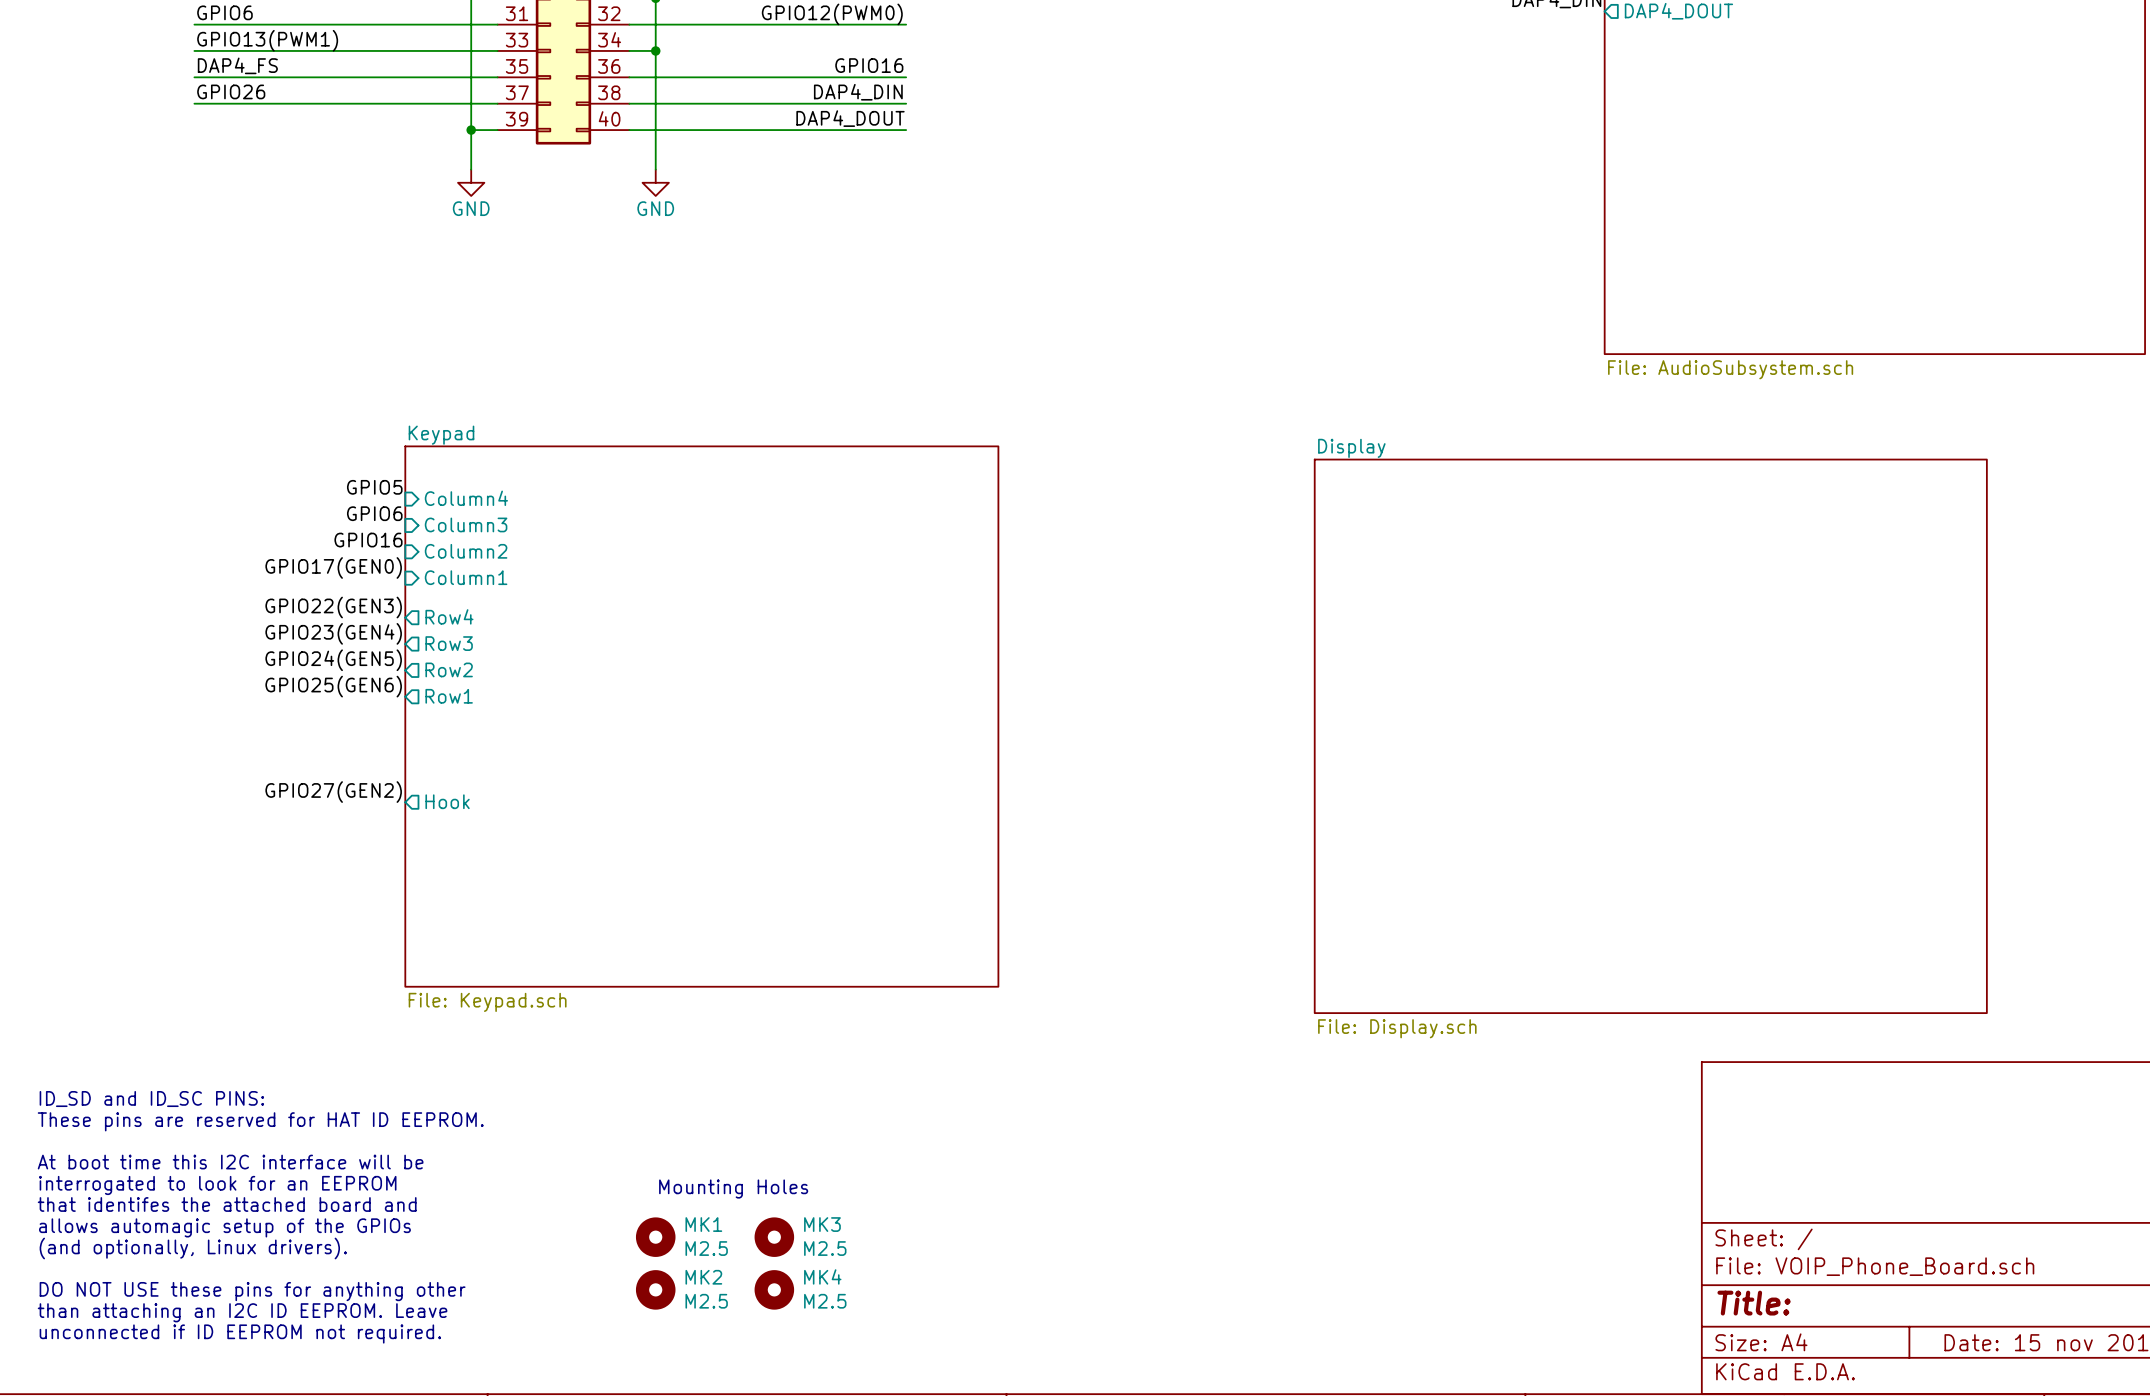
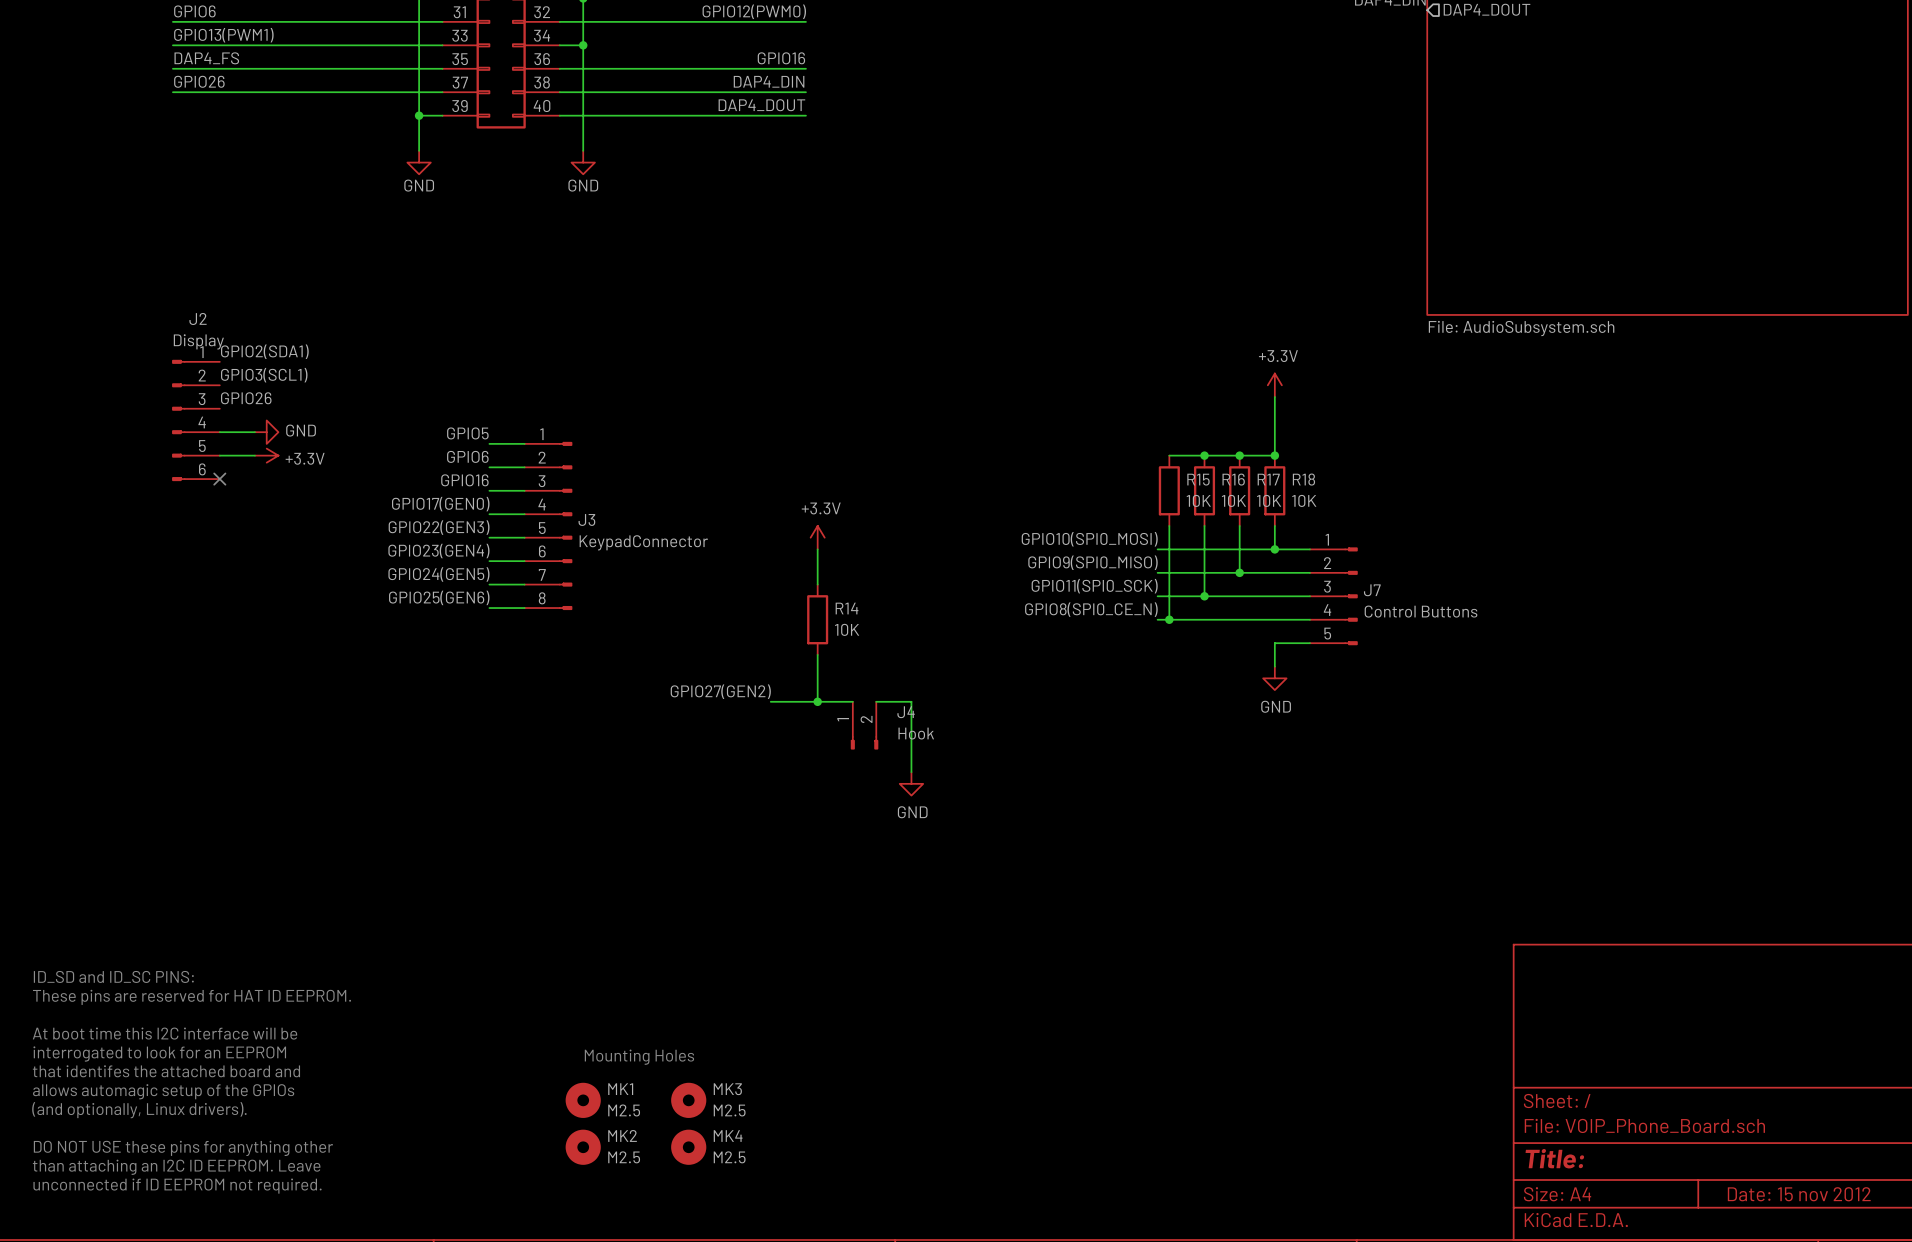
label: none -> GPIO2(SDA1) (264, 351)
label: none -> GPIO3(SCL1) (264, 375)
power symbol: none -> +3.3V (1274, 385)
wire: none -> (1274, 397) (1274, 455) (1169, 455)
label: none -> GPIO26 (246, 398)
J2: none -> Display (196, 420)
wire: none -> (219, 432) (254, 432)
power symbol: none -> GND (266, 432)
label position: GPIO5 (374, 487) -> GPIO5 (467, 433)
sheet pin: Column4 (466, 498) -> none
wire: none -> (489, 443) (524, 443)
wire: none -> (219, 455) (254, 455)
power symbol: none -> +3.3V (266, 455)
junction: none -> (1204, 455)
junction: none -> (1239, 455)
junction: none -> (1274, 455)
label position: GPIO6 (374, 513) -> GPIO6 (467, 456)
sheet pin: Column3 (466, 524) -> none
wire: none -> (489, 467) (524, 467)
no-connect mark: none -> (219, 479)
label position: GPIO16 (368, 540) -> GPIO16 (464, 480)
sheet pin: Column2 (466, 551) -> none
wire: none -> (489, 490) (524, 490)
R15: none -> 10K (1169, 490)
R16: none -> 10K (1204, 490)
R17: none -> 10K (1239, 490)
R18: none -> 10K (1274, 490)
label position: GPIO17(GEN0) (333, 567) -> GPIO17(GEN0) (440, 504)
sheet pin: Column1 (466, 577) -> none
wire: none -> (489, 514) (524, 514)
J3: none -> KeypadConnector (548, 525)
wire: none -> (1204, 525) (1204, 596)
wire: none -> (1239, 525) (1239, 572)
wire: none -> (1274, 525) (1274, 549)
wire: none -> (489, 537) (524, 537)
power symbol: none -> +3.3V (817, 537)
label position: GPIO22(GEN3) (333, 607) -> GPIO22(GEN3) (439, 527)
label: none -> GPIO10(SPI0_MOSI) (1089, 539)
sheet pin: Row4 (449, 616) -> none
wire: none -> (817, 549) (817, 584)
wire: none -> (1157, 549) (1310, 549)
junction: none -> (1274, 549)
wire: none -> (489, 561) (524, 561)
label position: GPIO23(GEN4) (333, 633) -> GPIO23(GEN4) (438, 551)
label: none -> GPIO9(SPI0_MISO) (1093, 562)
sheet pin: Row3 (449, 643) -> none
wire: none -> (1157, 572) (1310, 572)
junction: none -> (1239, 572)
wire: none -> (489, 584) (524, 584)
label position: GPIO24(GEN5) (333, 660) -> GPIO24(GEN5) (438, 574)
label: none -> GPIO11(SPI0_SCK) (1094, 586)
sheet pin: Row2 (449, 669) -> none
wire: none -> (1157, 596) (1310, 596)
junction: none -> (1204, 596)
J7: none -> Control Buttons (1333, 596)
wire: none -> (489, 608) (524, 608)
label position: GPIO25(GEN6) (333, 686) -> GPIO25(GEN6) (439, 597)
label: none -> GPIO8(SPI0_CE_N) (1091, 609)
sheet pin: Row1 (449, 696) -> none
R14: none -> 10K (817, 619)
wire: none -> (1157, 619) (1310, 619)
junction: none -> (1169, 619)
sheet Keypad: File: Keypad.sch (701, 716) -> none
wire: none -> (1310, 643) (1274, 643) (1274, 666)
wire: none -> (817, 654) (817, 701)
sheet Display: File: Display.sch (1650, 736) -> none
power symbol: none -> GND (1274, 678)
label: none -> GPIO27(GEN2) (720, 691)
wire: none -> (770, 701) (852, 701)
junction: none -> (817, 701)
wire: none -> (876, 701) (911, 701) (911, 772)
label: GPIO27(GEN2) (333, 792) -> none
sheet pin: Hook (447, 801) -> none
J4: none -> Hook (864, 725)
power symbol: none -> GND (911, 783)

